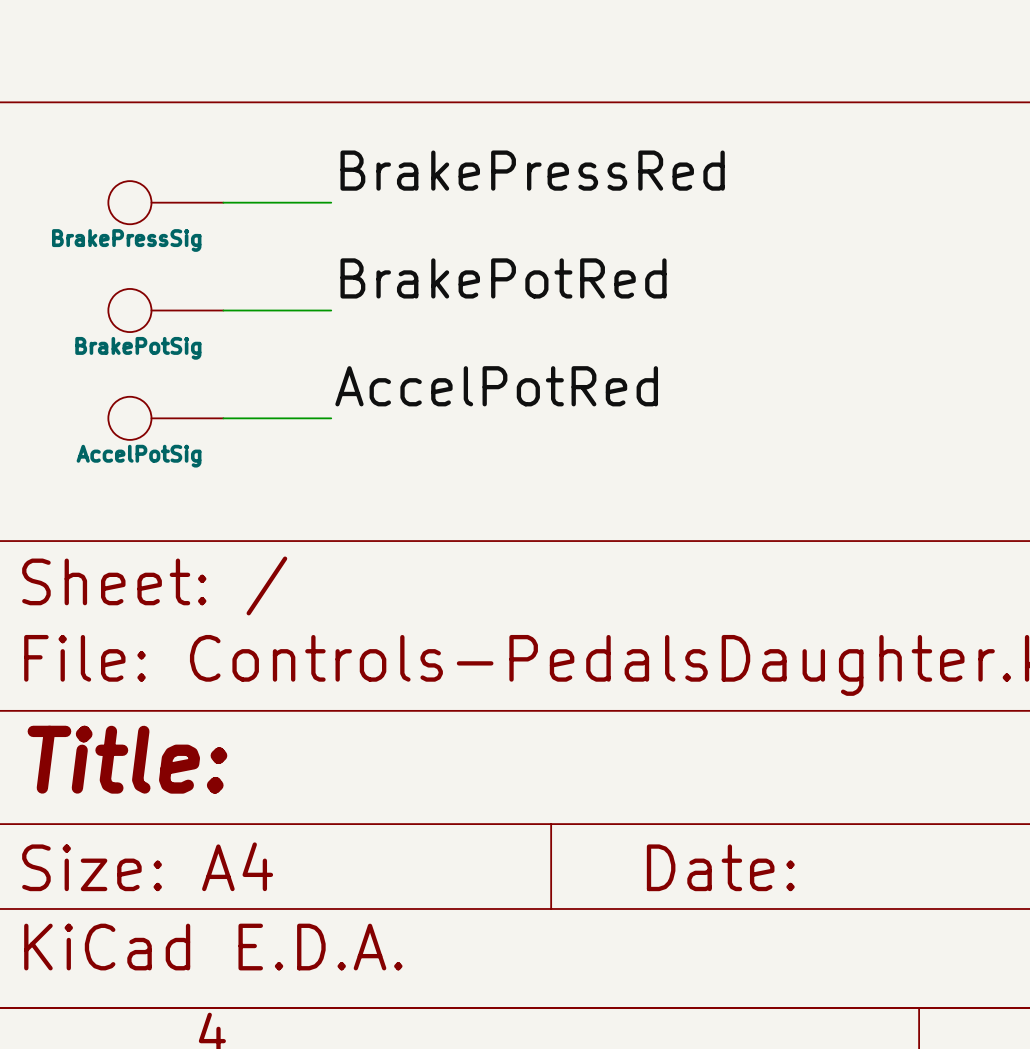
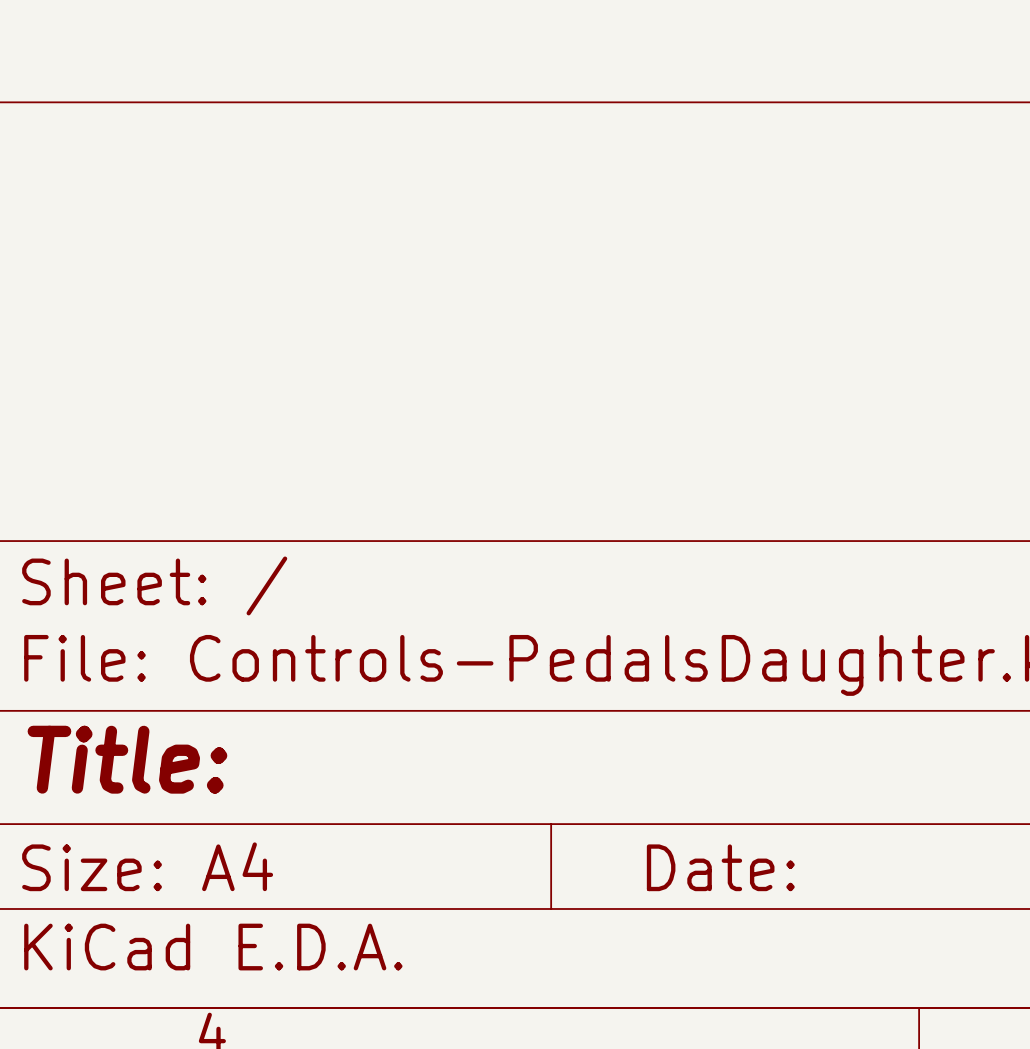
label: BrakePressRed (532, 170) -> none
part: BrakePressSig (165, 202) -> none
wire: (223, 202) (331, 202) -> none
label: BrakePotRed (503, 278) -> none
part: BrakePotSig (165, 310) -> none
wire: (223, 310) (331, 310) -> none
label: AccelPotRed (496, 386) -> none
part: AccelPotSig (165, 418) -> none
wire: (223, 418) (331, 418) -> none

